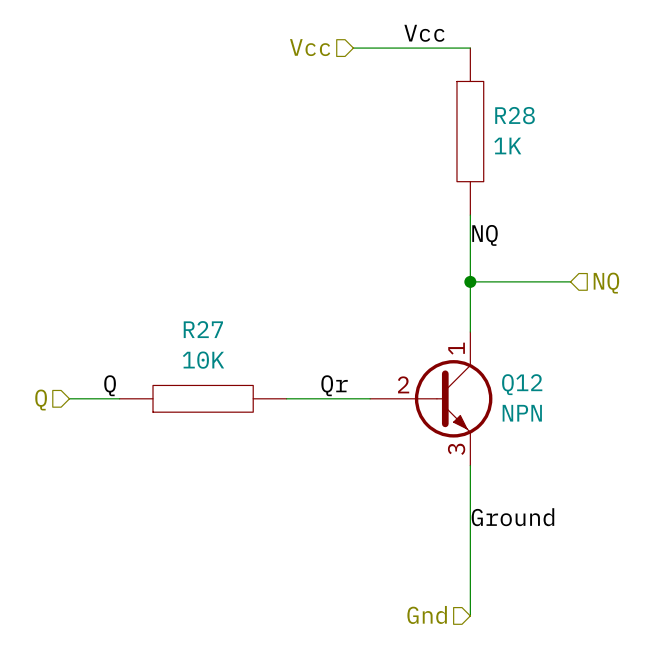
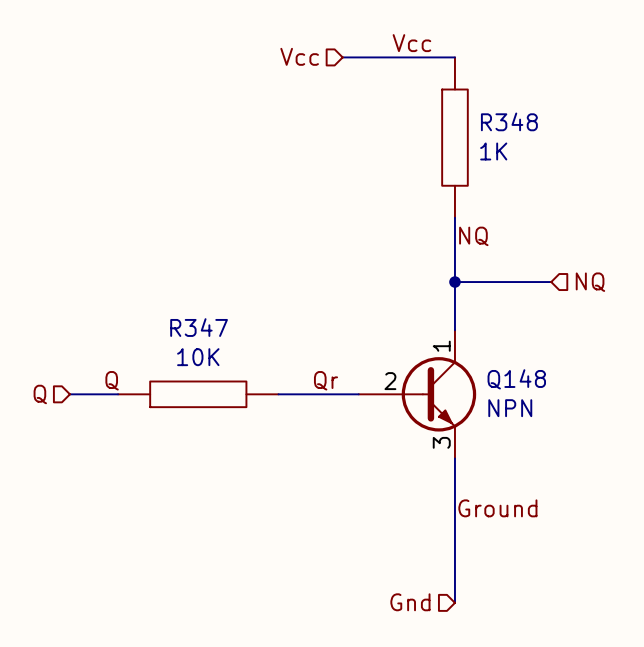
R28 name: R28 (515, 115) -> R348 (509, 121)
R27 name: R27 (203, 329) -> R347 (199, 327)
Q12 name: Q12 (522, 384) -> Q148 (516, 379)

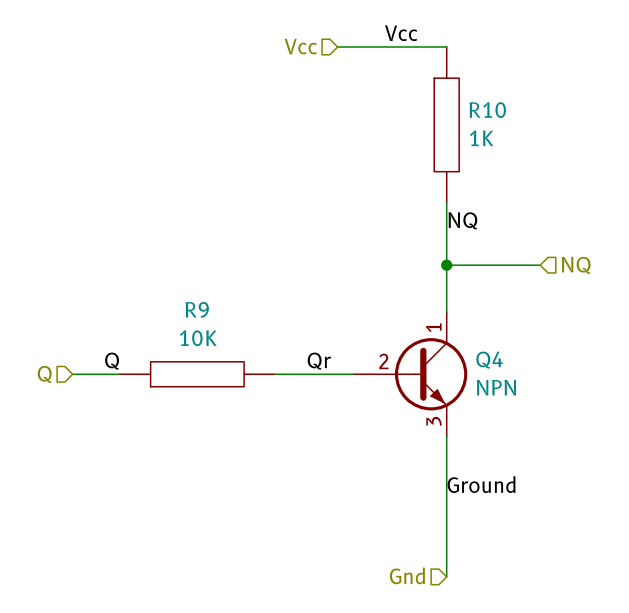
R348 name: R348 (509, 121) -> R10 (487, 110)
R347 name: R347 (199, 327) -> R9 (197, 309)
Q148 name: Q148 (516, 379) -> Q4 (489, 360)

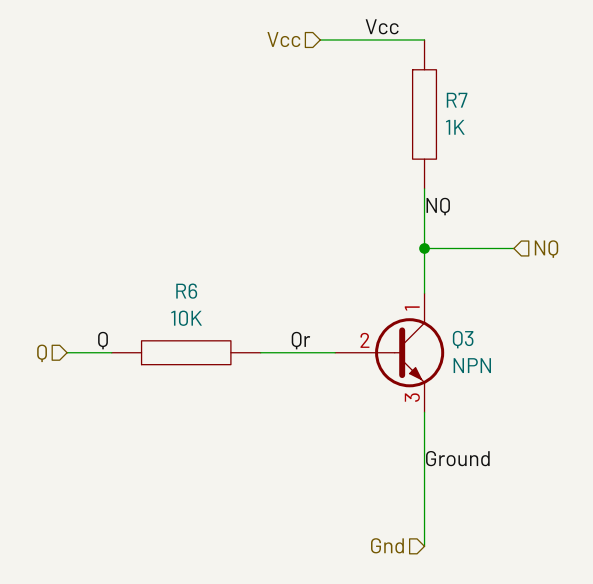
R10 name: R10 (487, 110) -> R7 (457, 100)
R9 name: R9 (197, 309) -> R6 (186, 291)
Q4 name: Q4 (489, 360) -> Q3 (463, 339)

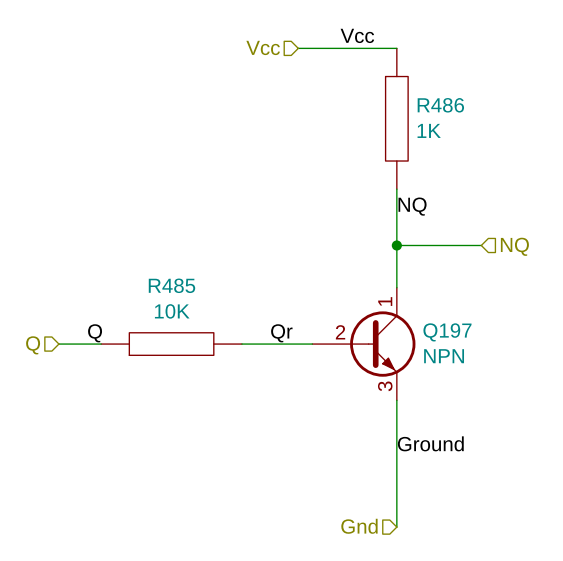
R7 name: R7 (457, 100) -> R486 (440, 105)
R6 name: R6 (186, 291) -> R485 (171, 285)
Q3 name: Q3 (463, 339) -> Q197 (447, 332)

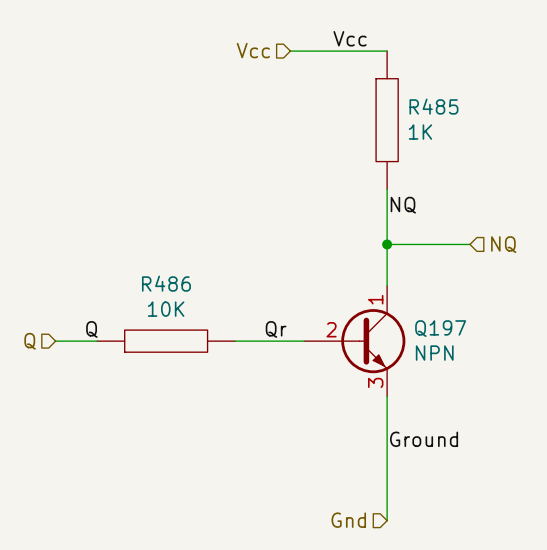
R486 name: R486 (440, 105) -> R485 (433, 106)
R485 name: R485 (171, 285) -> R486 (166, 283)

